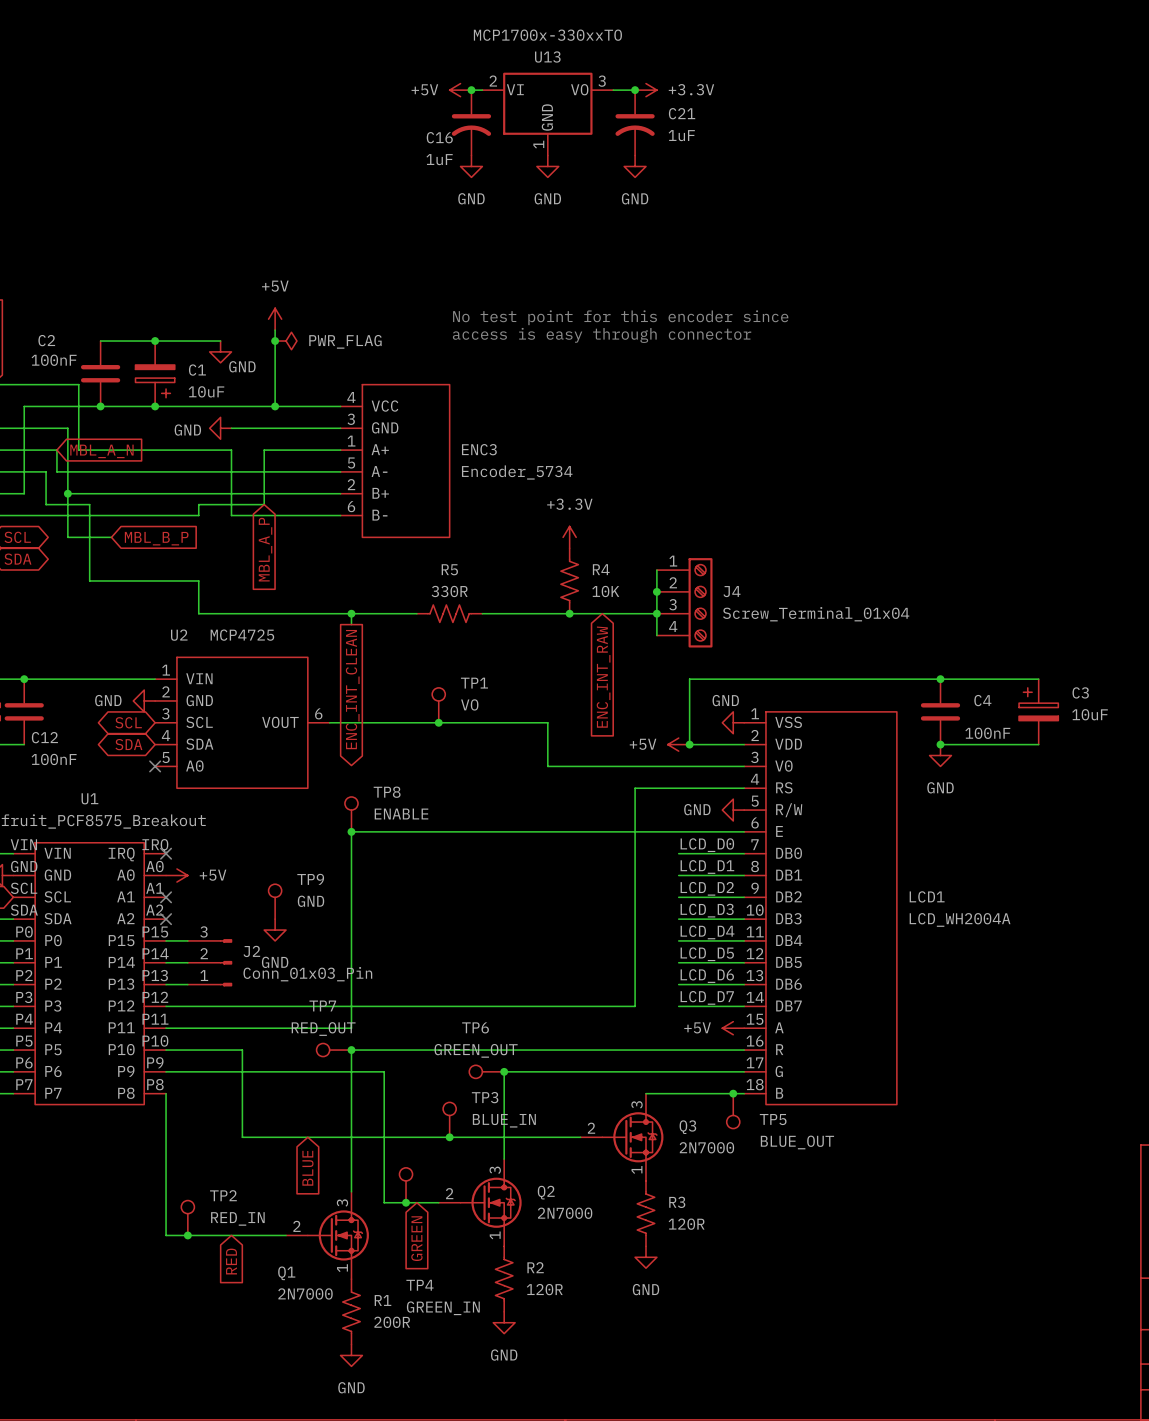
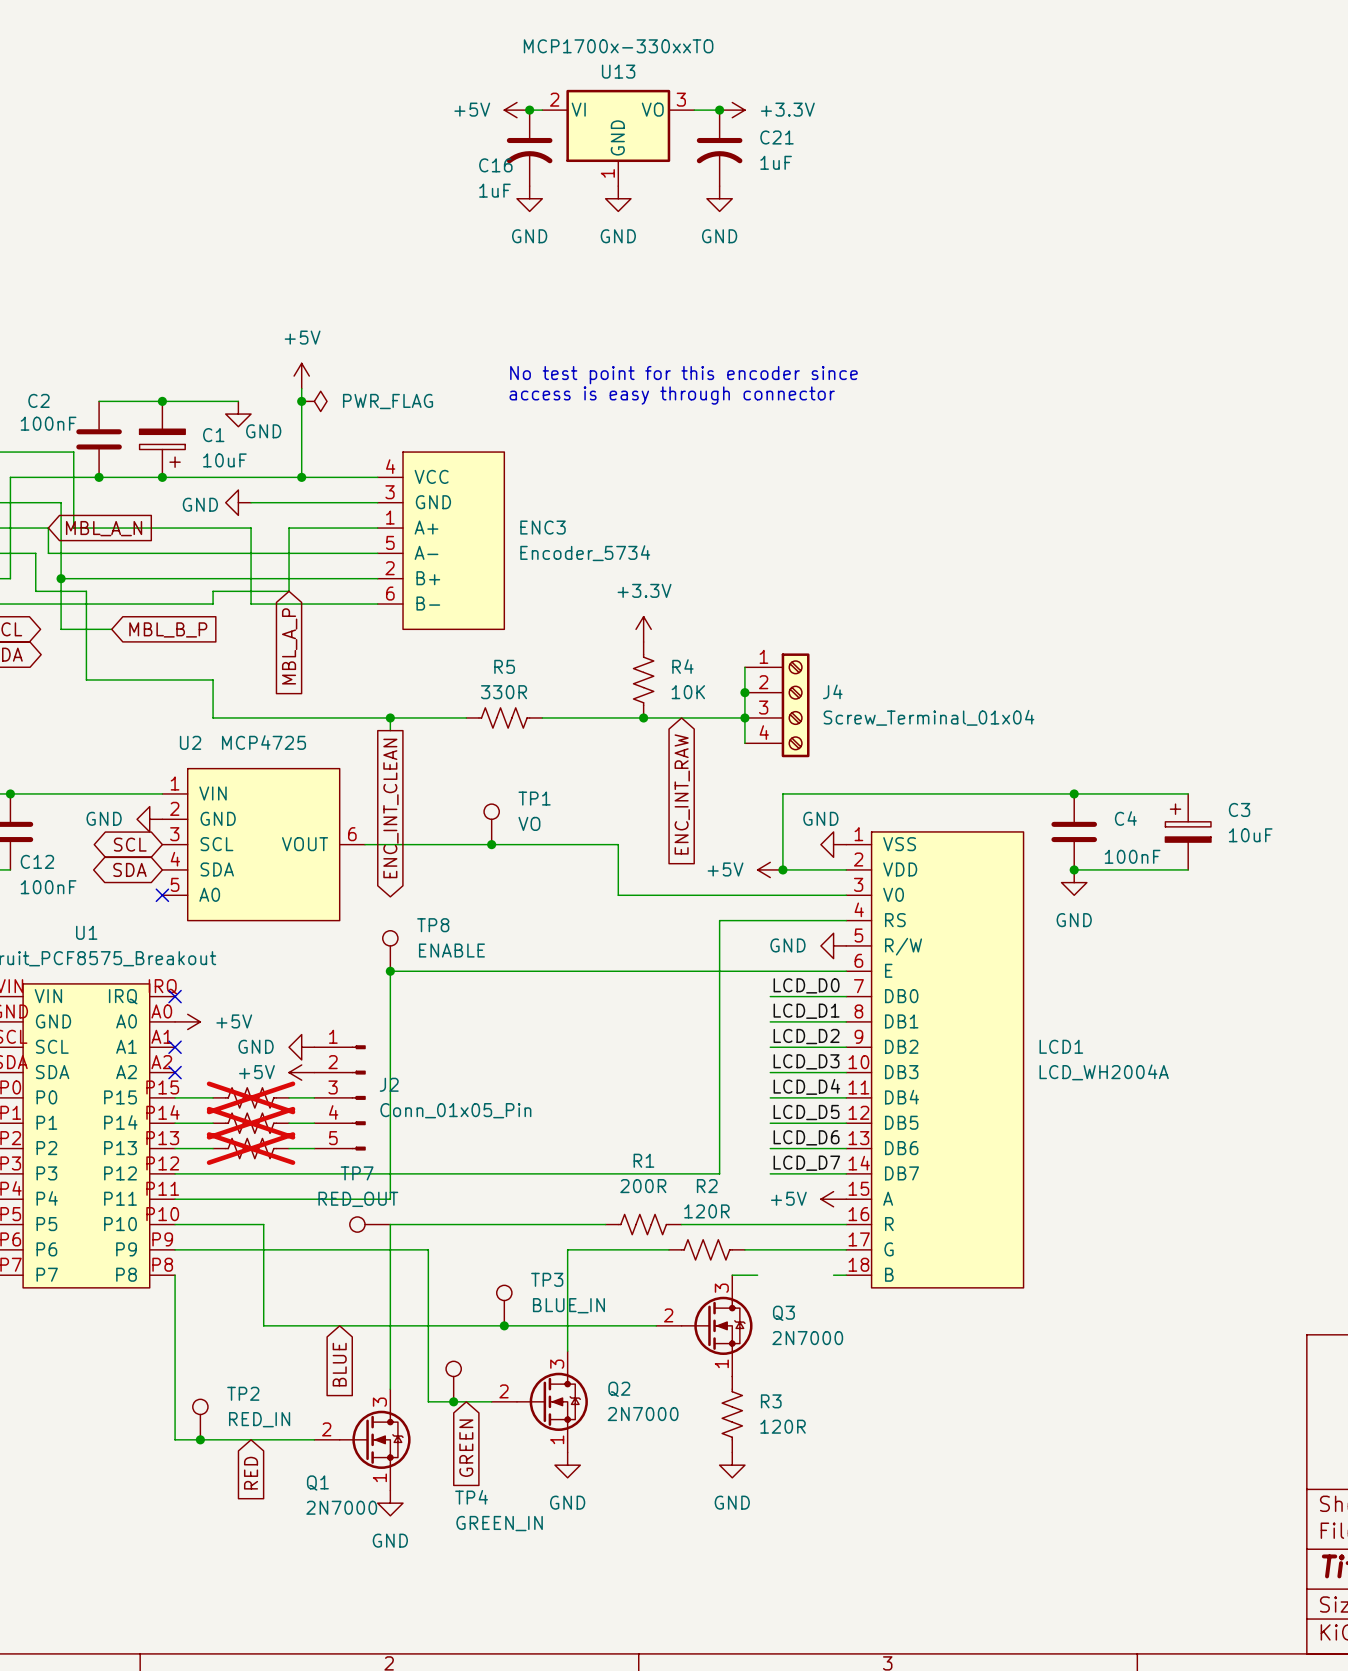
TP9: GND (275, 901) -> none
power symbol: none -> +5V (301, 1072)
power symbol rotation: 0° (275, 930) -> 90° clockwise (301, 1047)
power symbol position: GND (275, 930) -> GND (301, 1047)
J2 symbol: [187, 939, 233, 987] -> [314, 1045, 366, 1151]
part: none -> (251, 1097)
wire: none -> (289, 1097) (314, 1097)
part: none -> (251, 1123)
wire: none -> (289, 1123) (314, 1123)
J2 value: Conn_01x03_Pin (307, 974) -> Conn_01x05_Pin (455, 1110)
part: none -> (251, 1148)
wire: none -> (289, 1148) (314, 1148)
junction: (351, 1050) -> none
TP6: GREEN_OUT (486, 1071) -> none
junction: (504, 1071) -> none
wire: (667, 1093) (733, 1093) -> none
junction: (733, 1093) -> none
TP5: BLUE_OUT (733, 1111) -> none
R2 name position: R2 (535, 1267) -> R2 (707, 1186)
R2 rotation: 0° (504, 1279) -> 90° clockwise (706, 1249)
R2 position: (504, 1279) -> (706, 1249)
R2 value position: 120R (544, 1289) -> 120R (706, 1211)
R1 name position: R1 (383, 1300) -> R1 (643, 1160)
R1 rotation: 0° (351, 1311) -> 90° clockwise (643, 1224)
R1 position: (351, 1311) -> (643, 1224)
R1 value position: 200R (392, 1322) -> 200R (643, 1186)
power symbol position: GND (504, 1322) -> GND (567, 1465)
power symbol position: GND (351, 1355) -> GND (390, 1503)

